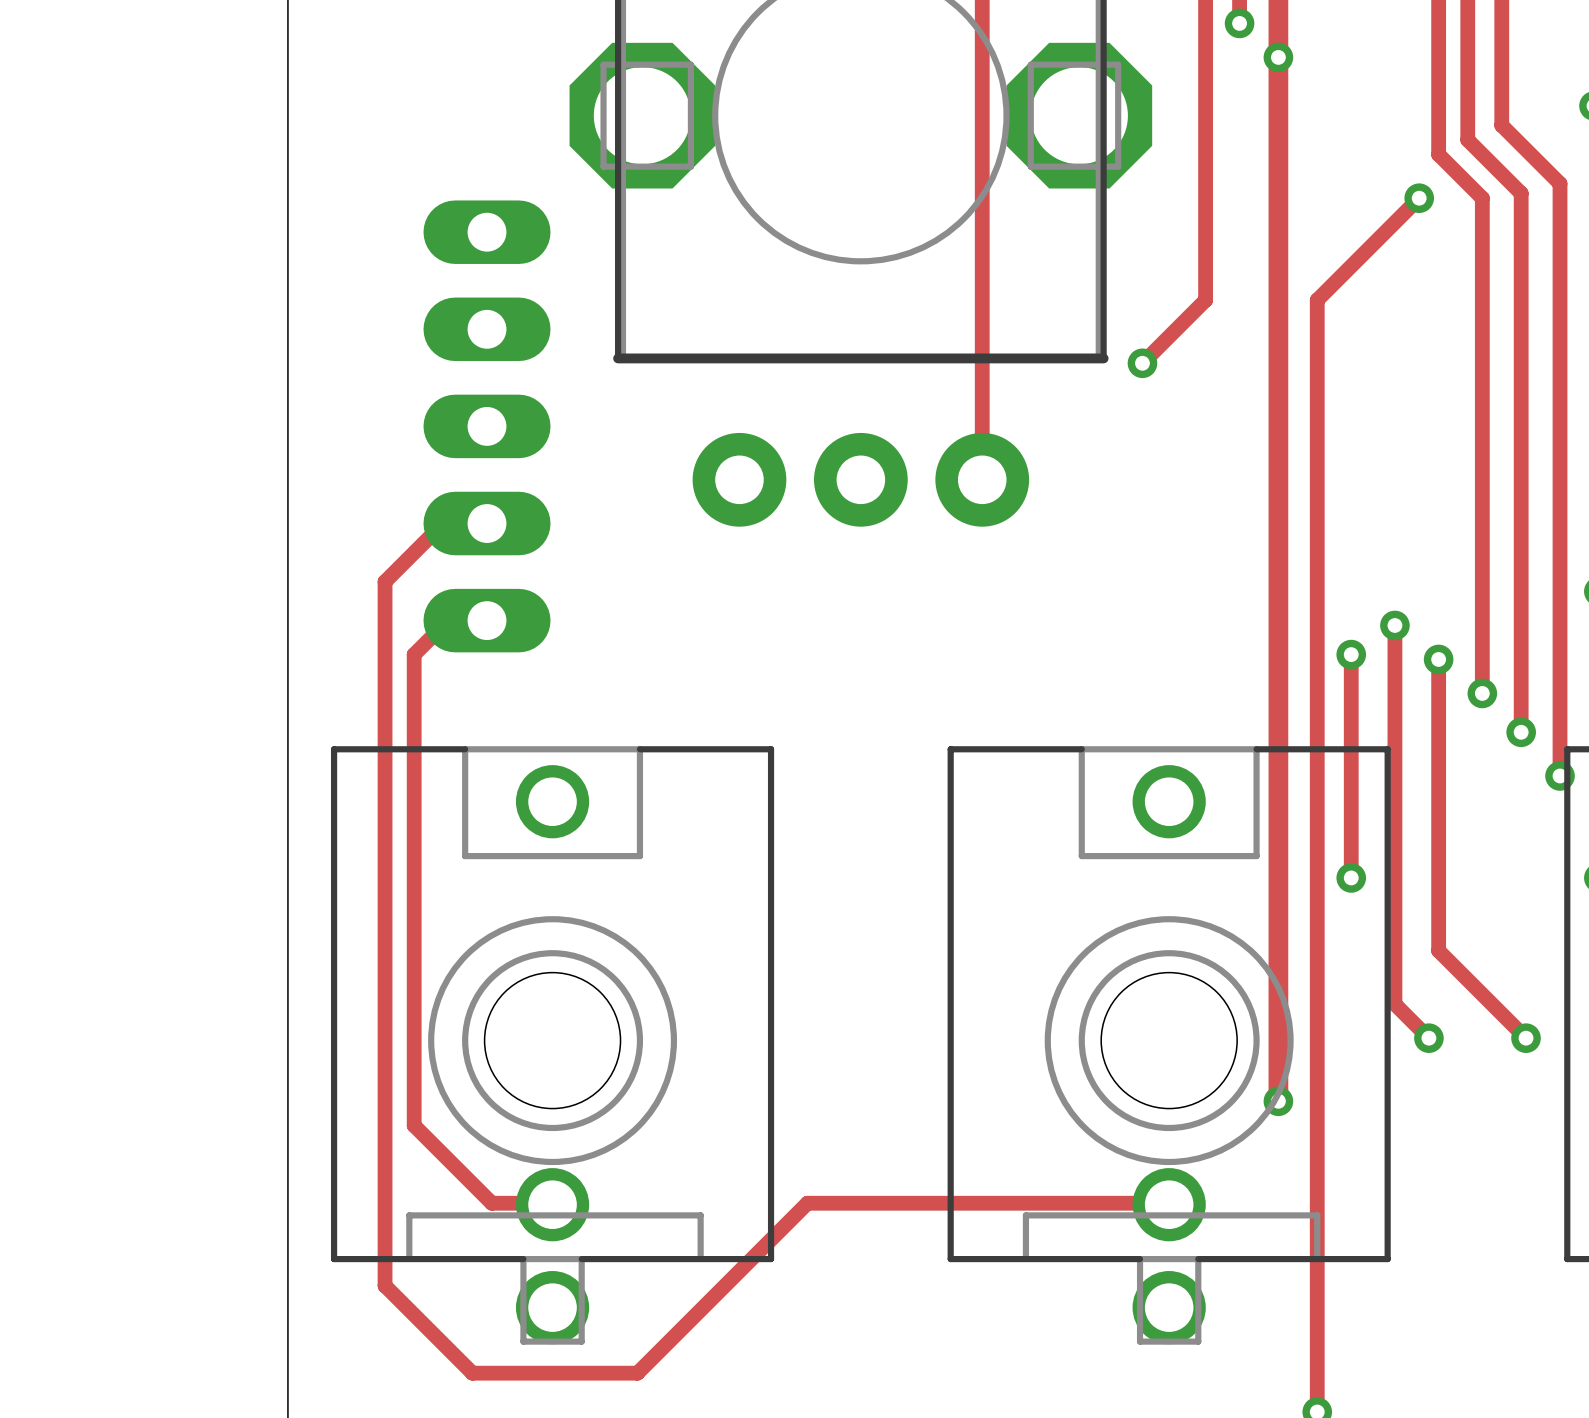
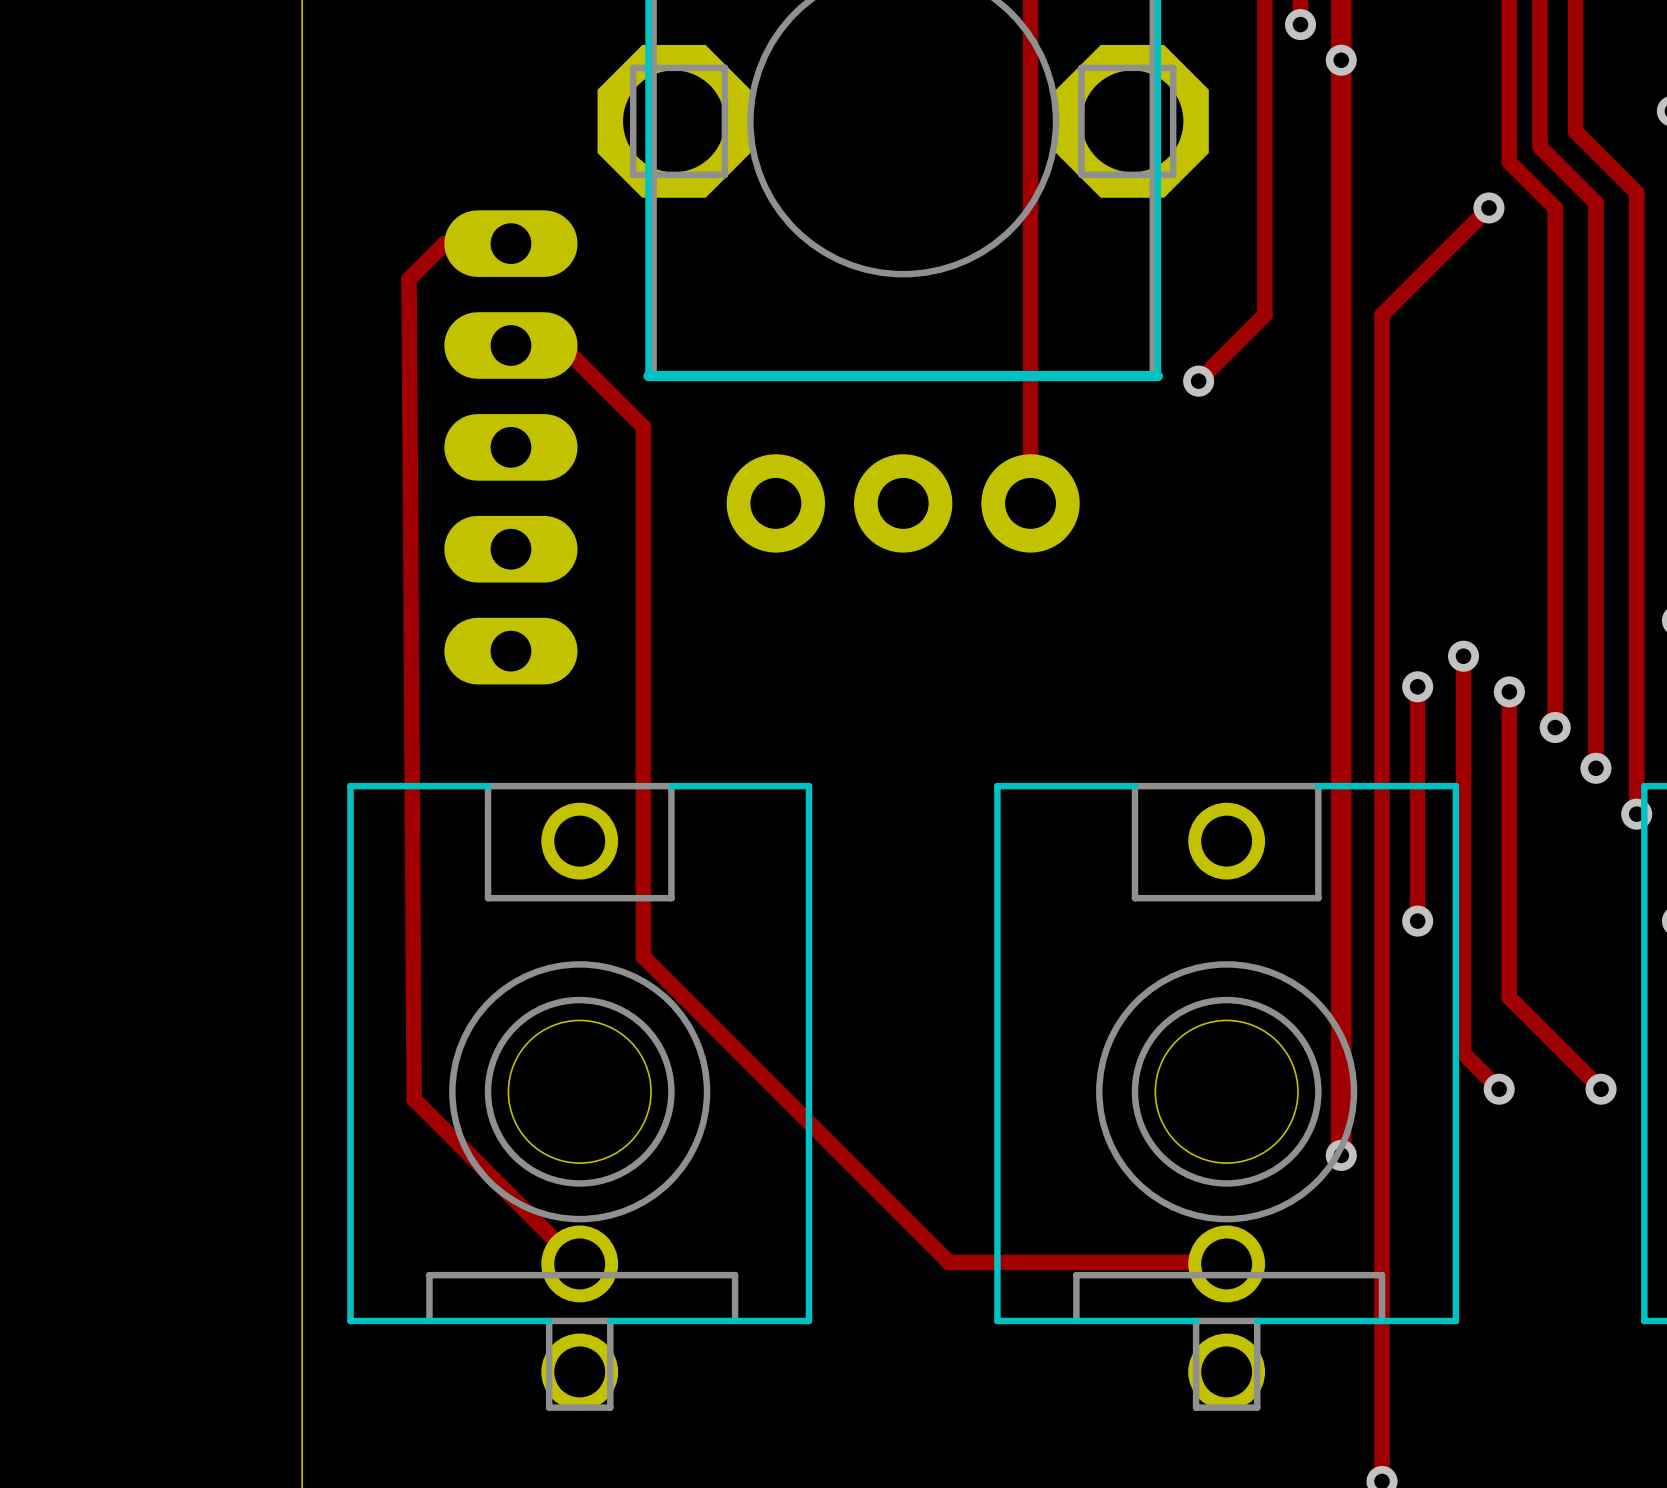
track: (487, 523) (443, 523) (385, 581) (385, 1285) (472, 1373) (637, 1373) (807, 1203) (904, 1203) -> (510, 345) (561, 345) (643, 427) (643, 956) (949, 1262)
track: (487, 620) (448, 620) (414, 654) (414, 1125) (491, 1203) (550, 1203) -> (510, 243) (444, 243) (409, 279) (414, 1099) (577, 1262)

